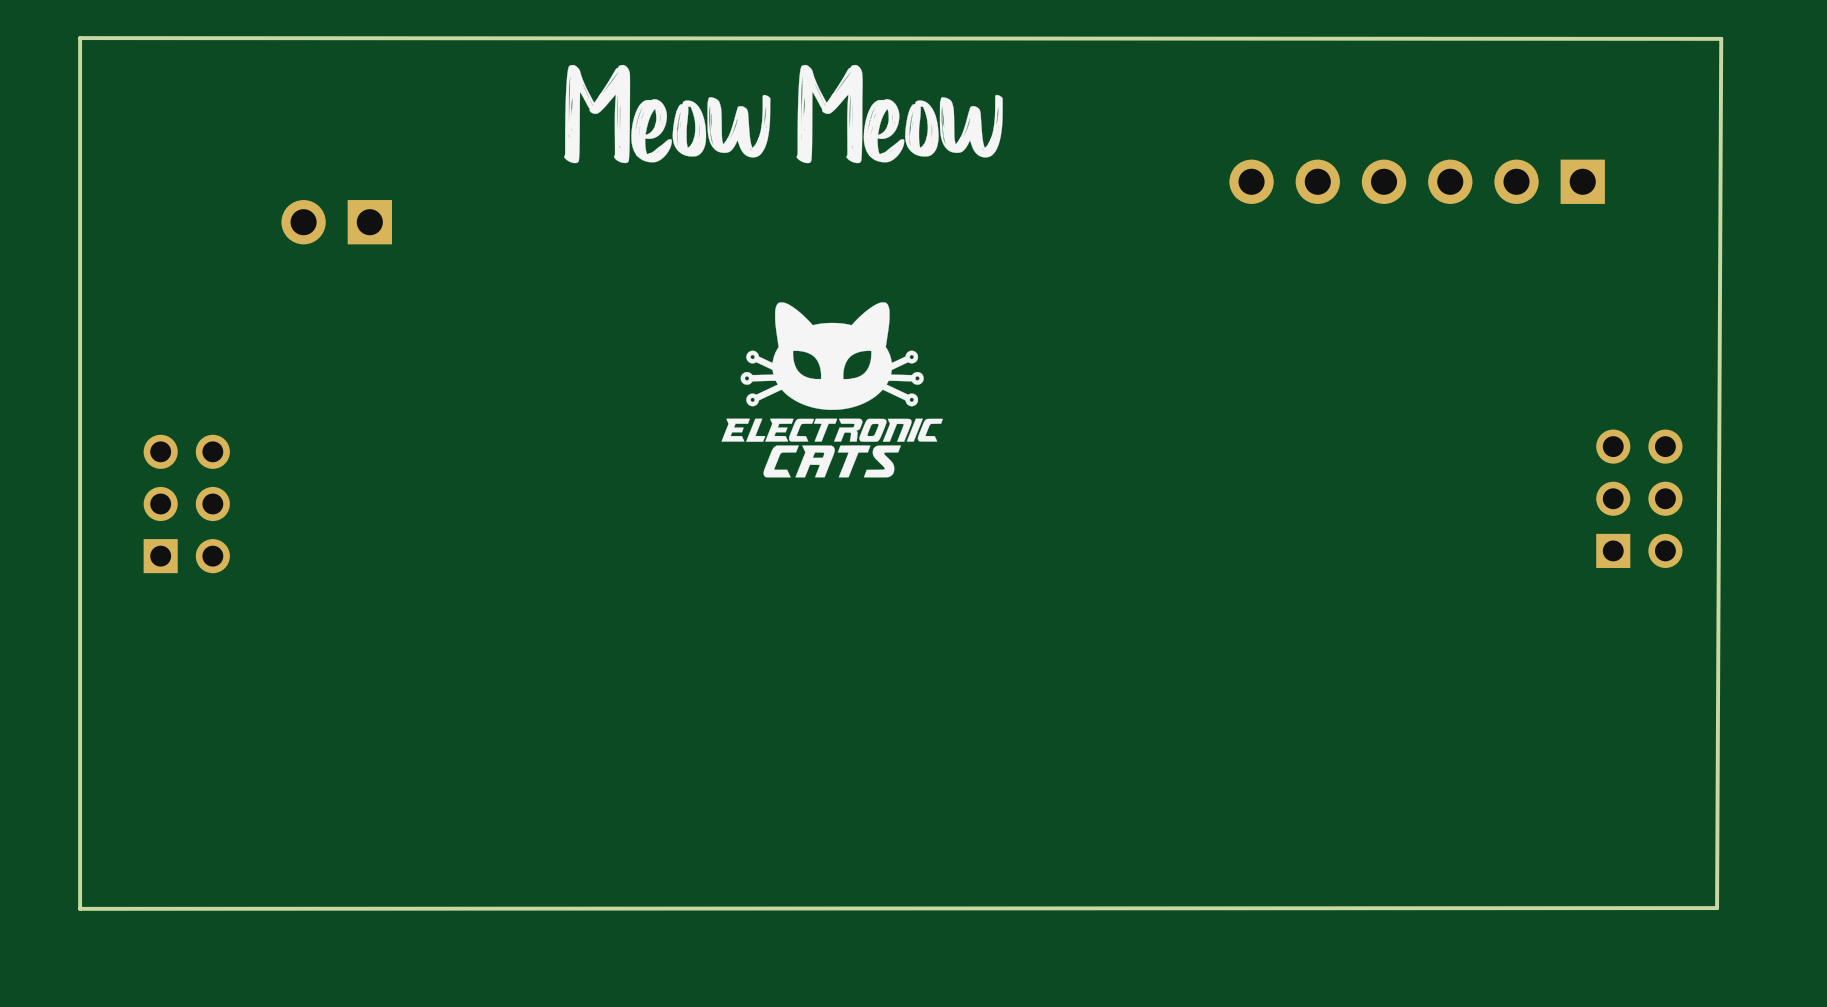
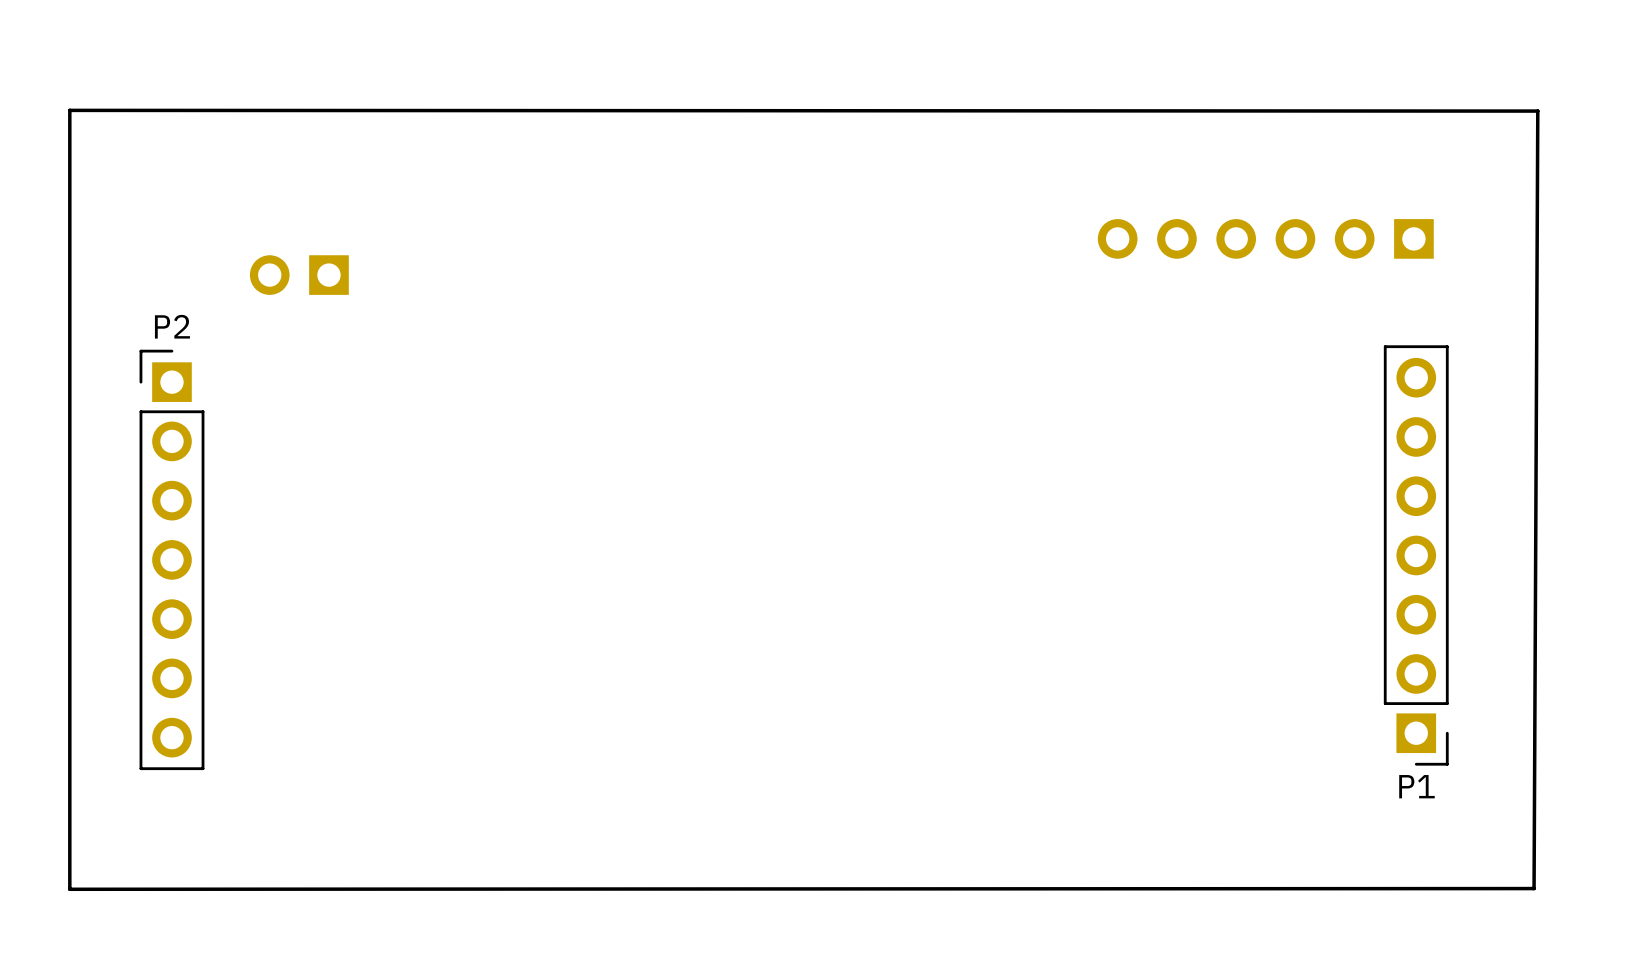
drawing: [564, 64, 1003, 164] -> none
drawing: [721, 302, 943, 478] -> none
part: (1639, 498) -> none
part: (186, 503) -> none
P1: none -> (1416, 555)
P2: none -> (171, 559)

